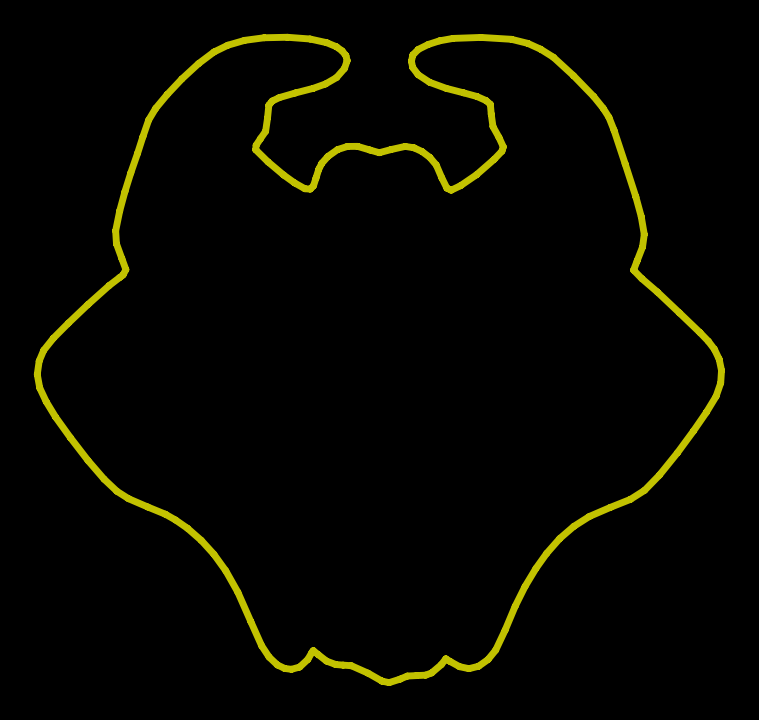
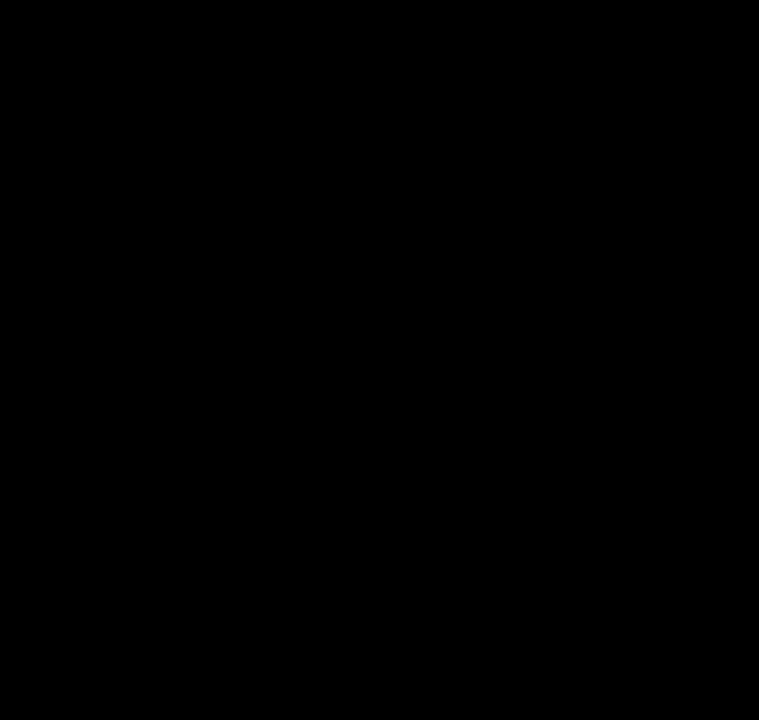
board edge: (287, 37) (244, 40) (213, 51) (181, 78) (155, 108) (148, 120) (130, 172) (115, 230) (116, 243) (125, 269) (123, 275) (68, 323) (43, 350) (39, 361) (37, 374) (39, 387) (55, 417) (104, 479) (128, 498) (175, 520) (201, 540) (213, 554) (237, 592) (261, 645) (277, 664) (291, 669) (299, 667) (313, 650) (326, 661) (335, 664) (351, 665) (381, 681) (389, 682) (407, 676) (431, 672) (445, 658) (459, 666) (468, 668) (478, 666) (488, 659) (495, 650) (525, 586) (546, 553) (559, 538) (589, 516) (630, 499) (644, 490) (677, 452) (716, 396) (720, 383) (721, 370) (719, 359) (708, 341) (633, 270) (642, 246) (644, 234) (635, 196) (614, 130) (608, 117) (593, 96) (553, 57) (527, 43) (511, 39) (481, 37) (439, 40) (418, 49) (412, 54) (412, 67) (418, 74) (429, 82) (476, 96) (490, 104) (492, 126) (503, 146) (501, 151) (476, 174) (460, 185) (451, 190) (446, 188) (436, 165) (429, 157) (414, 147) (405, 146) (379, 152) (357, 146) (347, 146) (337, 149) (327, 156) (318, 169) (313, 185) (310, 189) (304, 188) (283, 175) (255, 149) (256, 145) (265, 131) (268, 105) (279, 97) (325, 83) (336, 77) (344, 68) (347, 60) (342, 50) (326, 42) (287, 37) -> none

